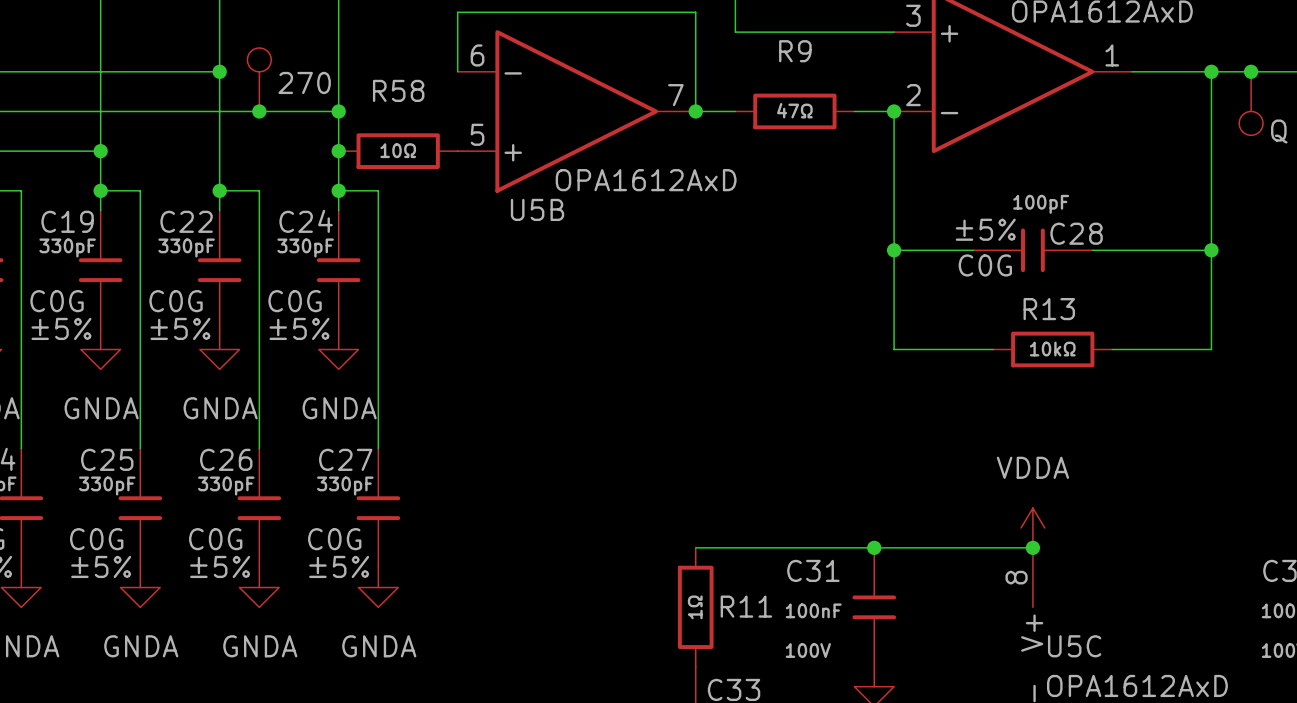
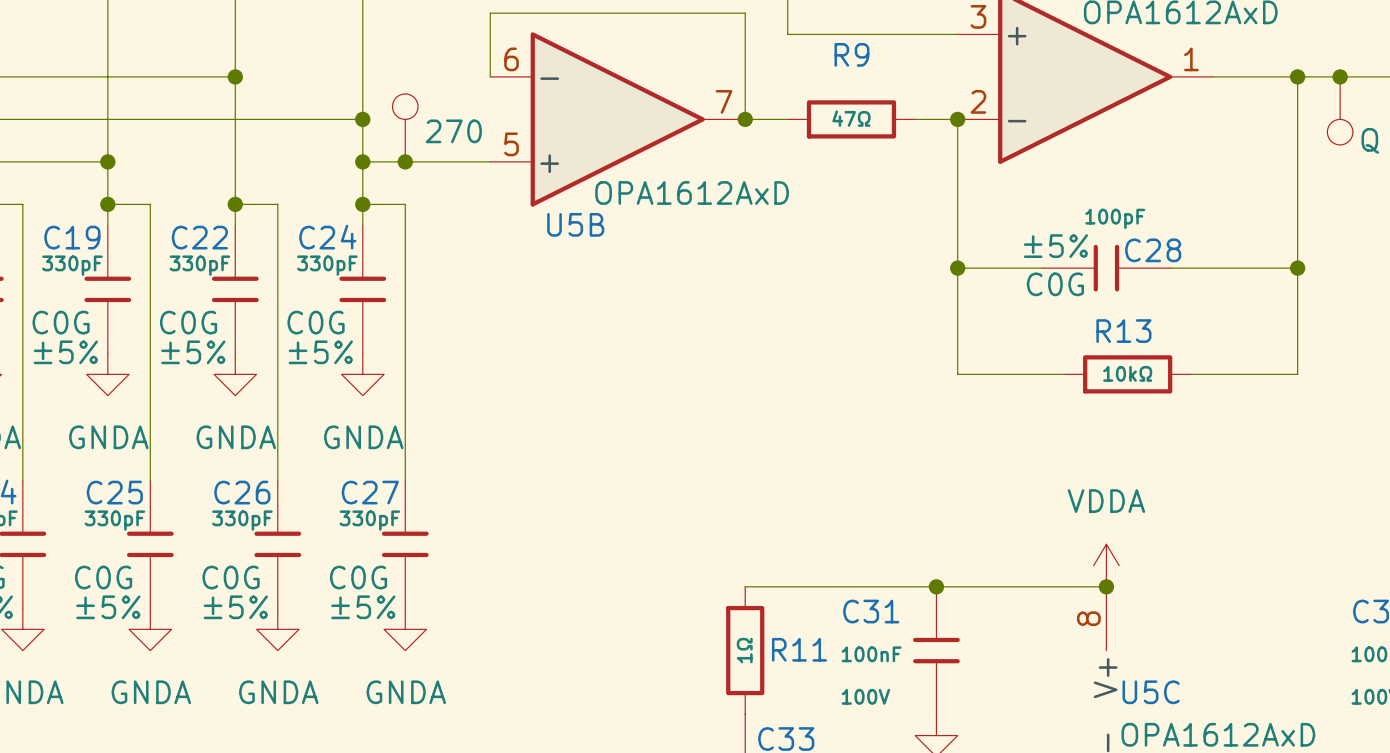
part position: (259, 79) -> (405, 127)
junction: (259, 111) -> none
wire: none -> (362, 161) (490, 161)
junction: none -> (405, 161)
R58: 10Ω (398, 151) -> none

